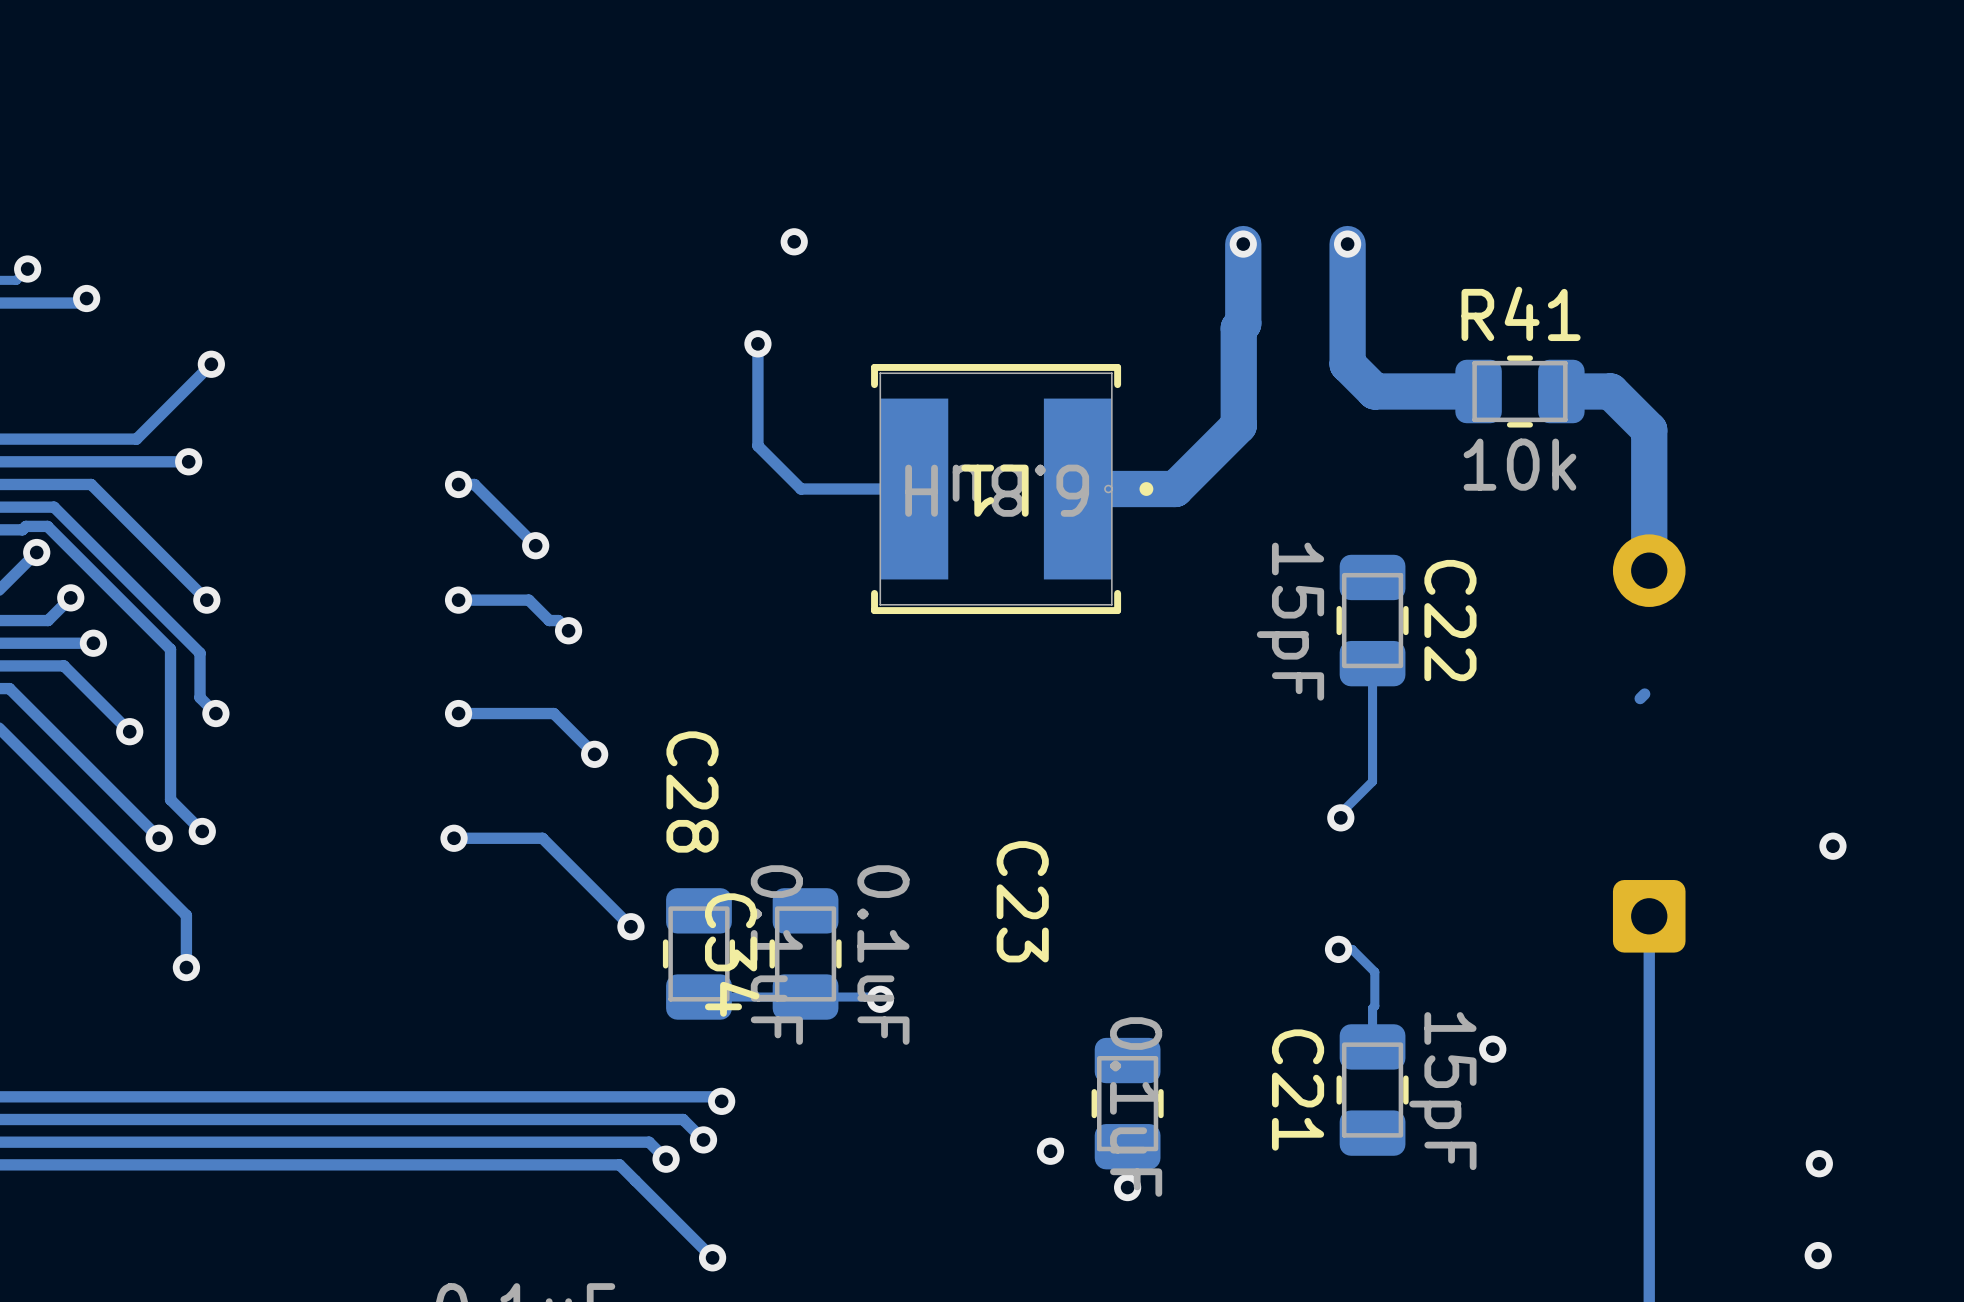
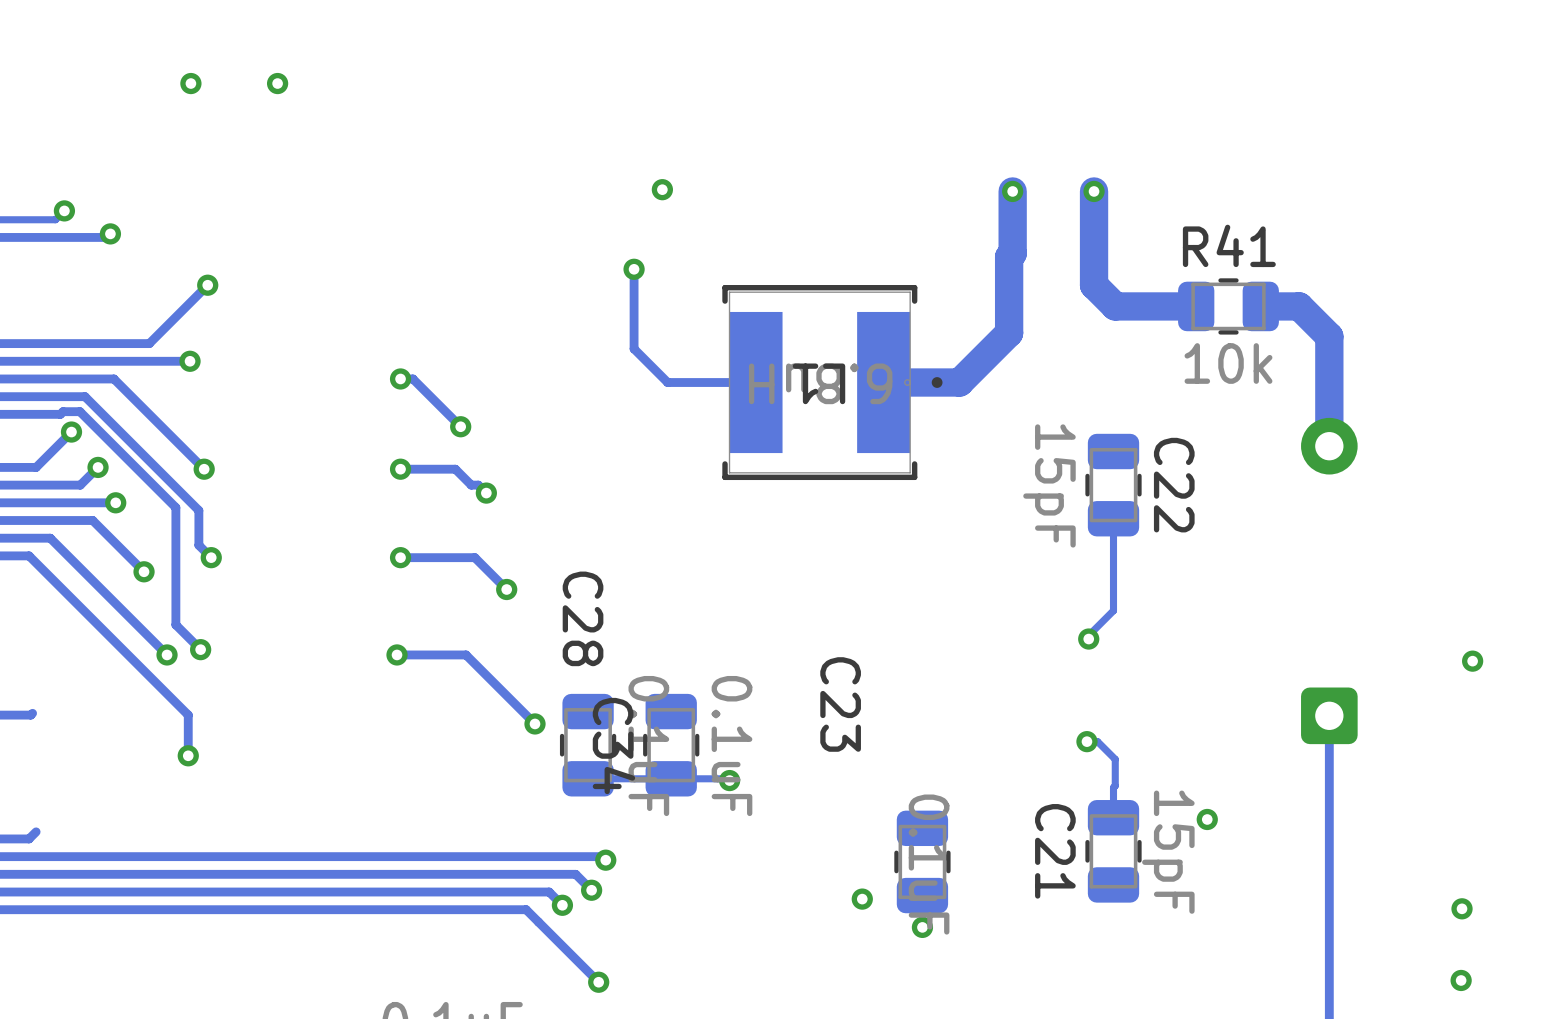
via: none -> (190, 83)
via: none -> (277, 83)
track: (1644, 694) (1640, 698) -> none

